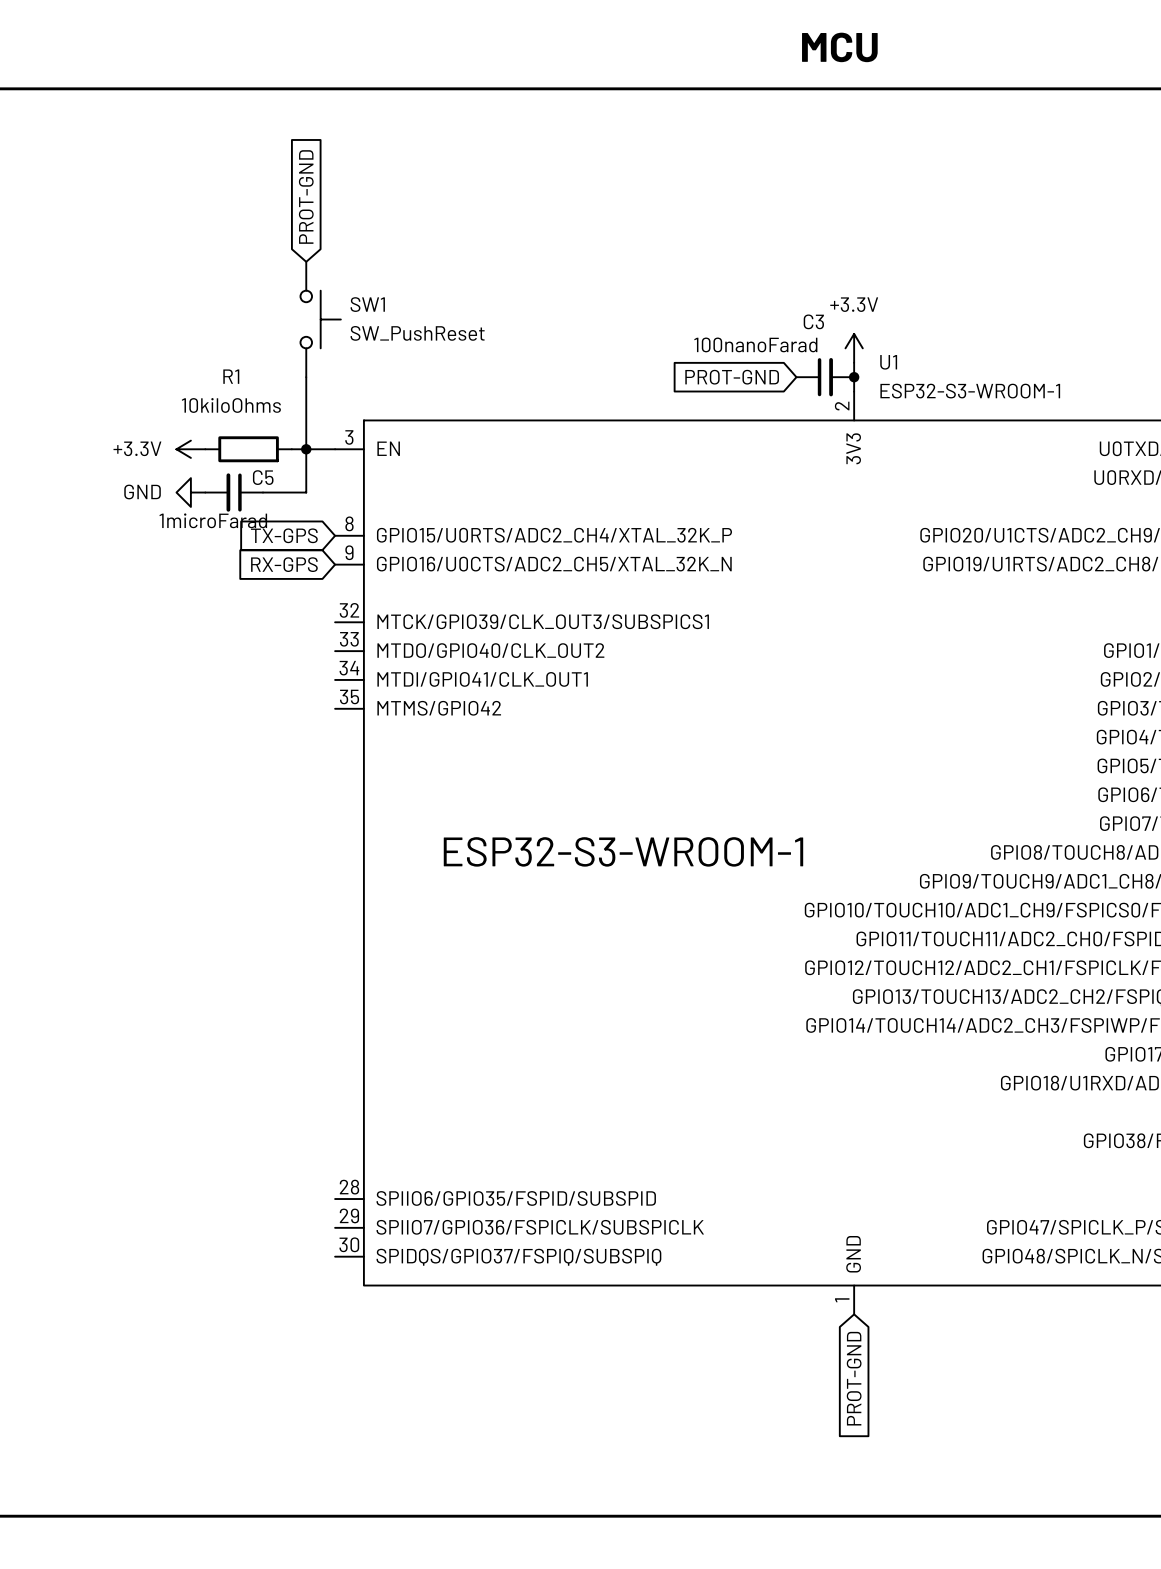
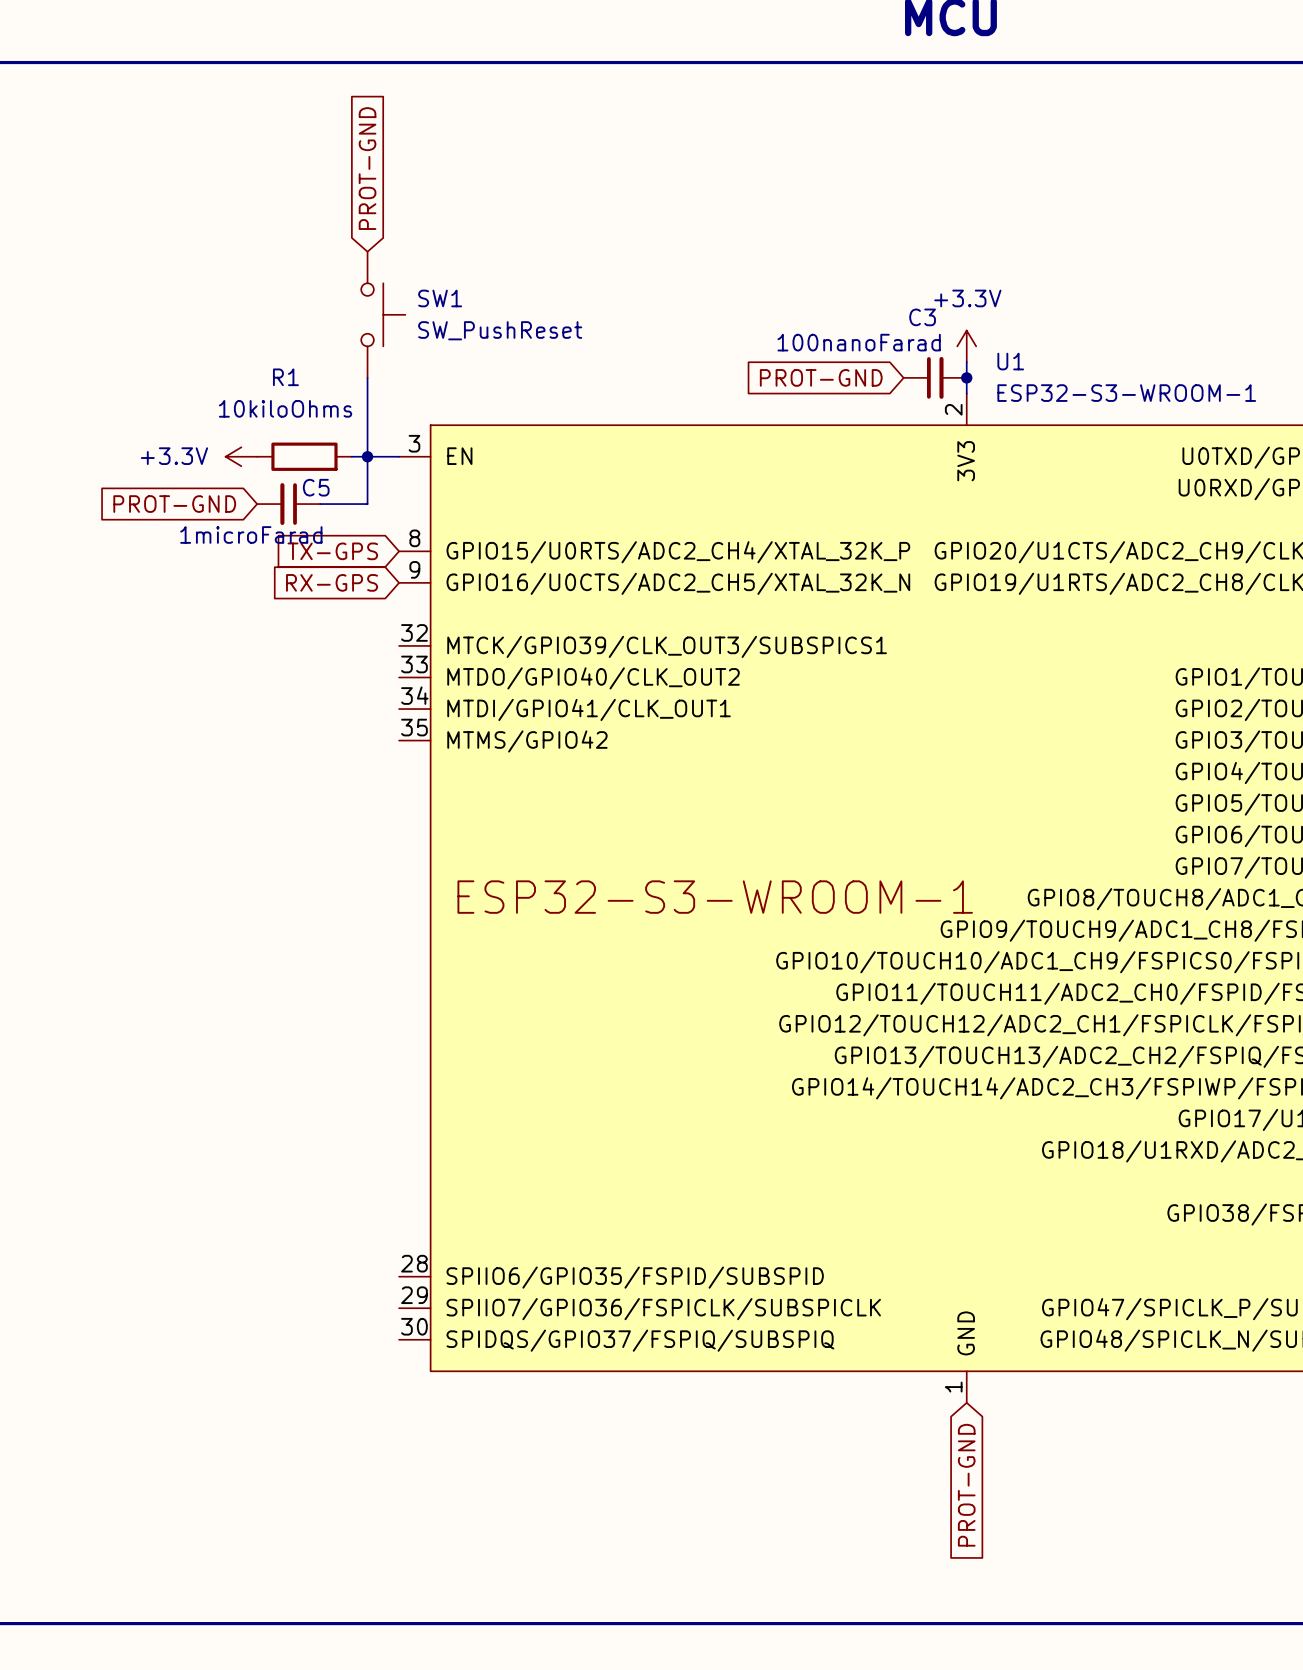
global label: none -> PROT-GND (174, 504)
power symbol: GND (190, 492) -> none

